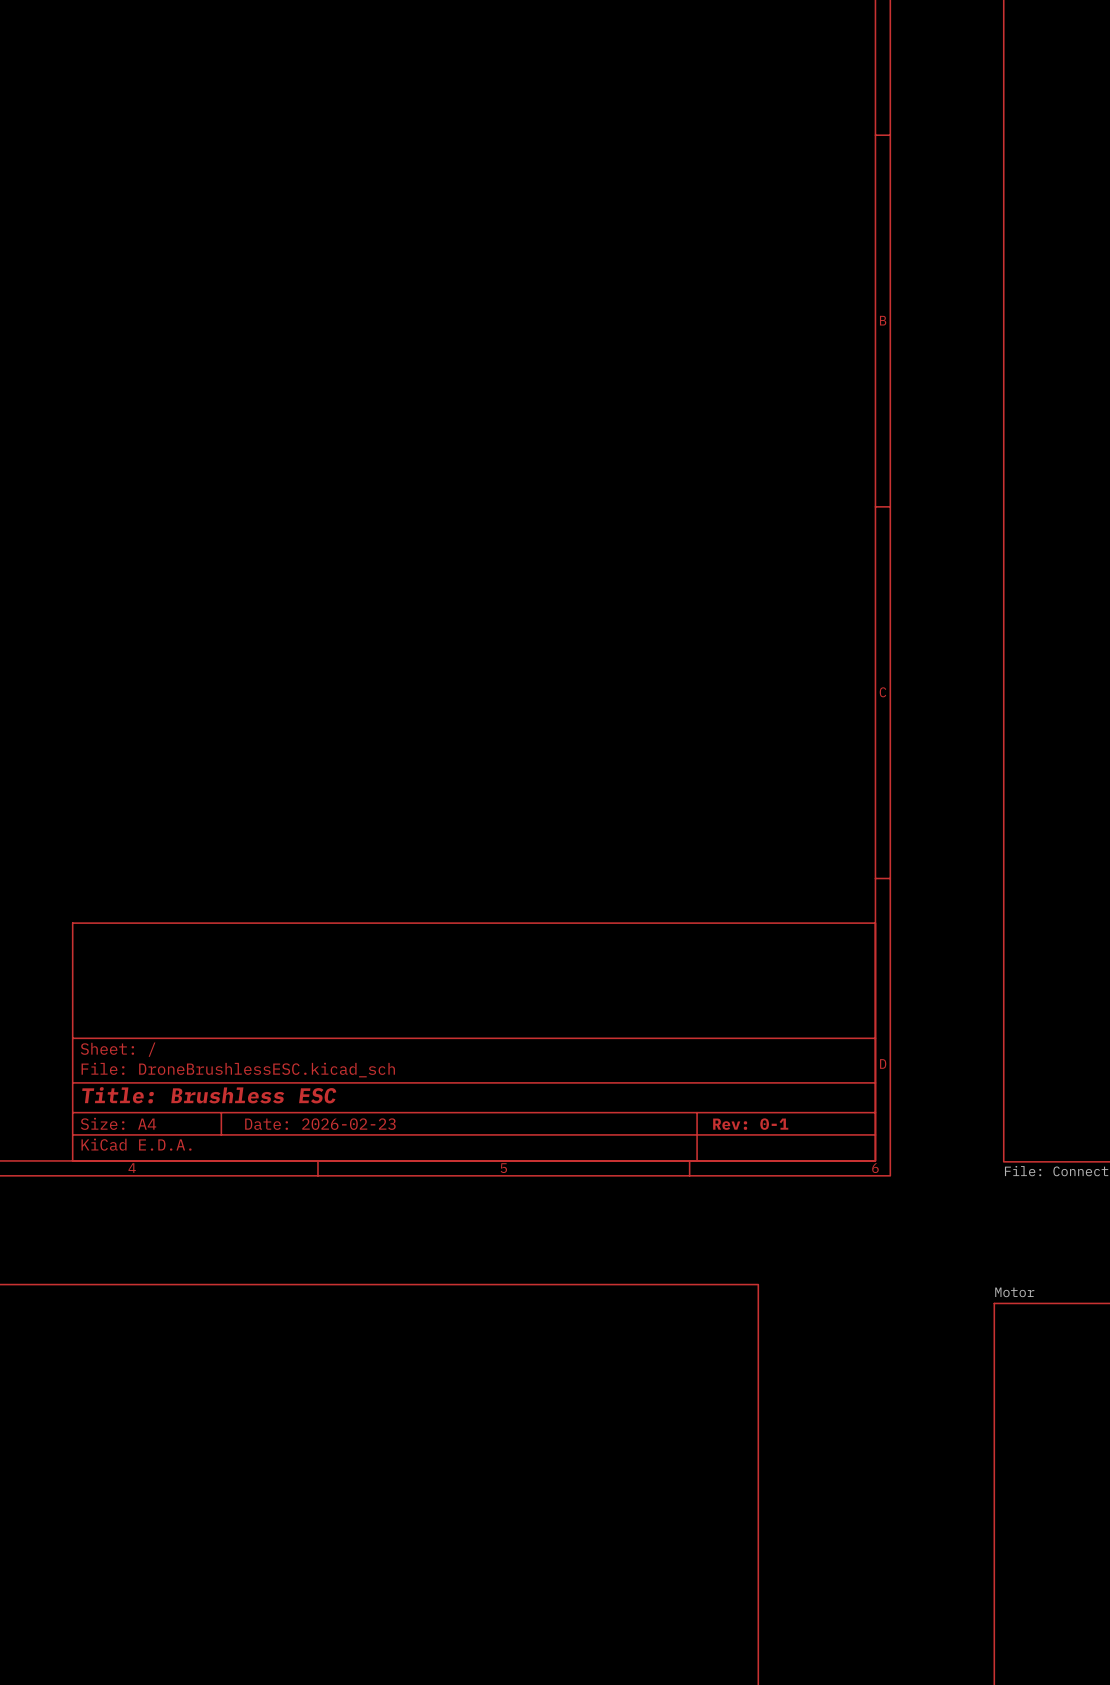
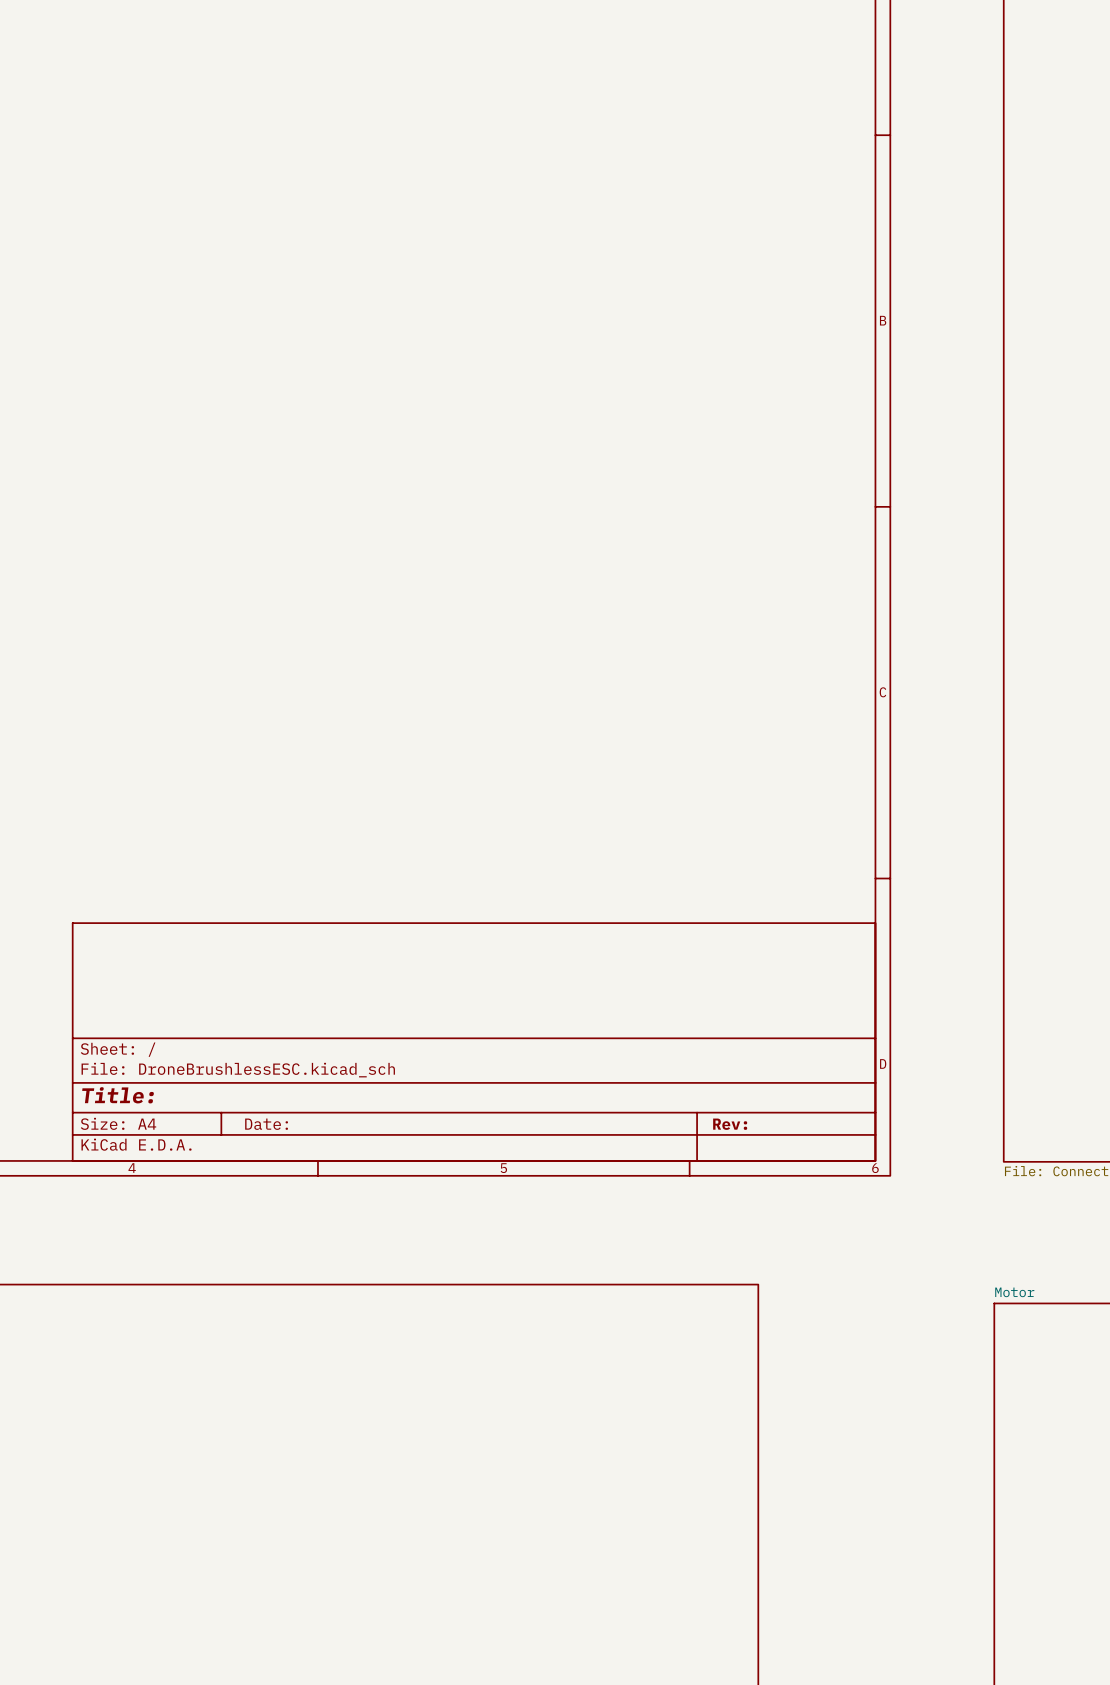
title block: Title: Brushless ESC (209, 1095) -> Title: (118, 1095)
title block: Date: 2026-02-23 (320, 1124) -> Date: (266, 1124)
title block: Rev: 0-1 (750, 1124) -> Rev: (730, 1124)

